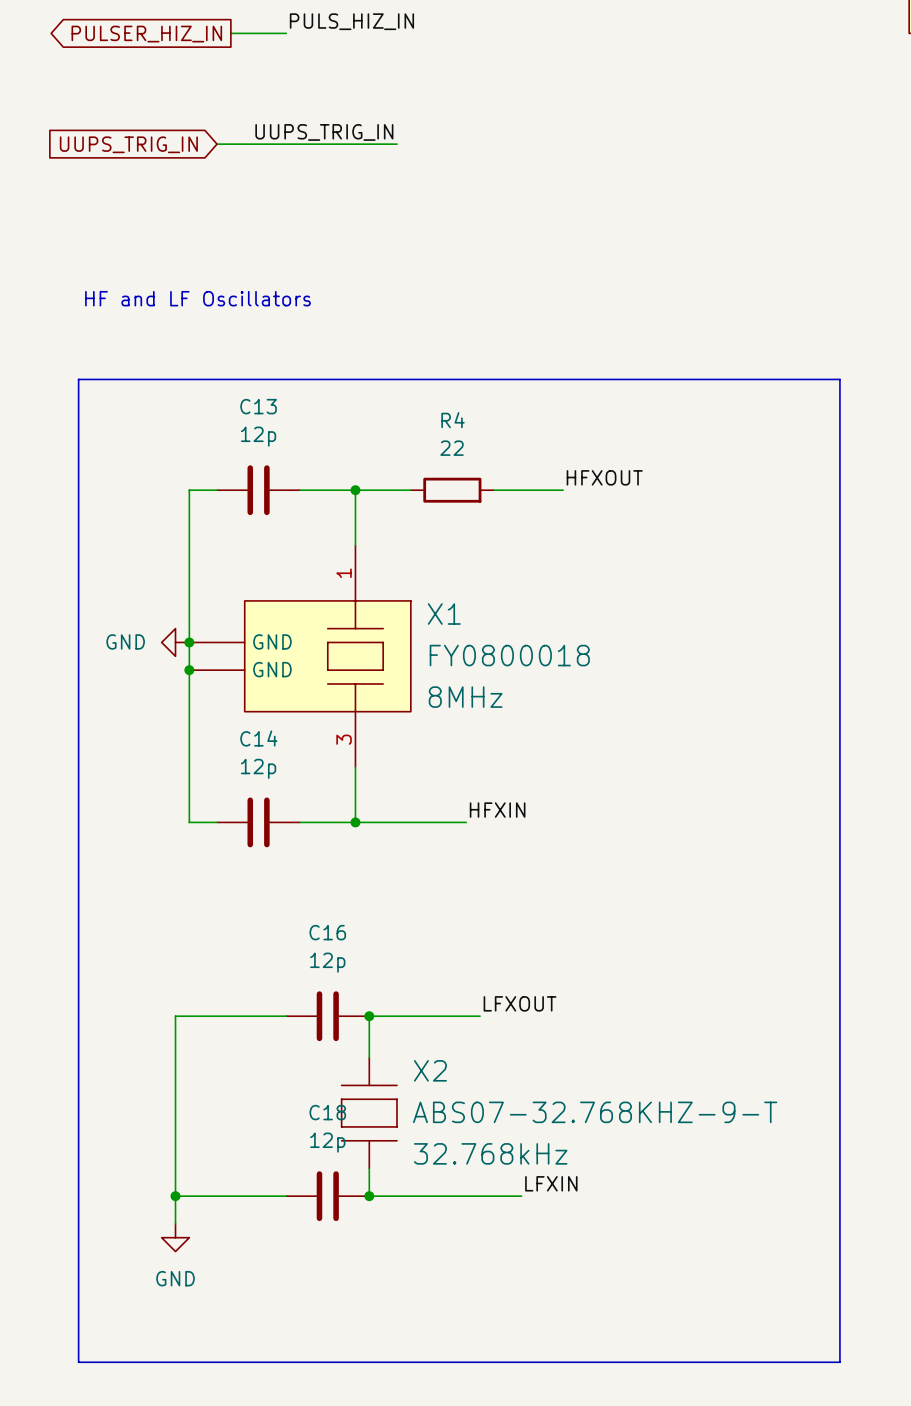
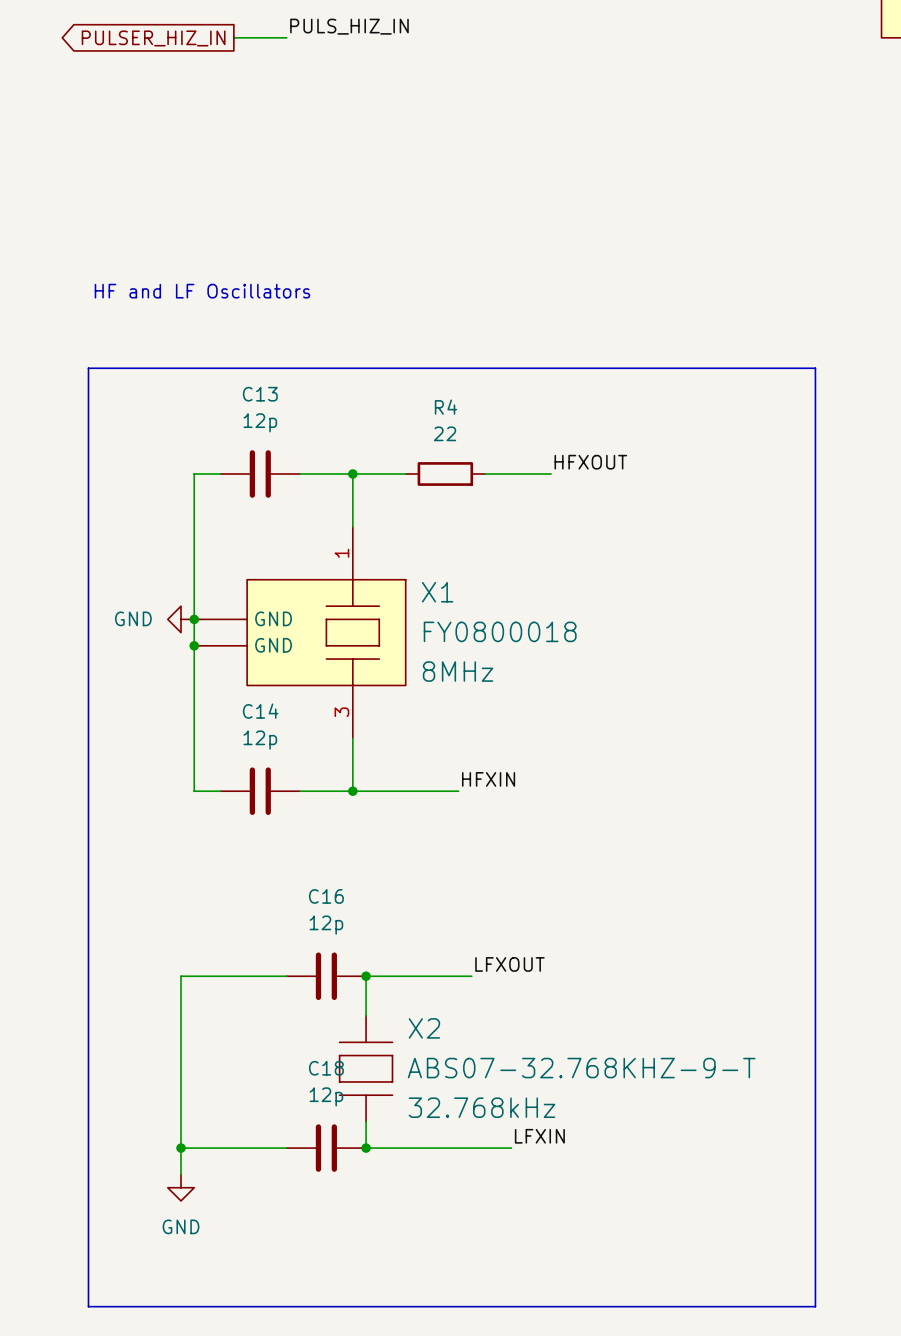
label: UUPS_TRIG_IN (324, 132) -> none
global label: UUPS_TRIG_IN (128, 144) -> none
wire: (217, 144) (396, 144) -> none

